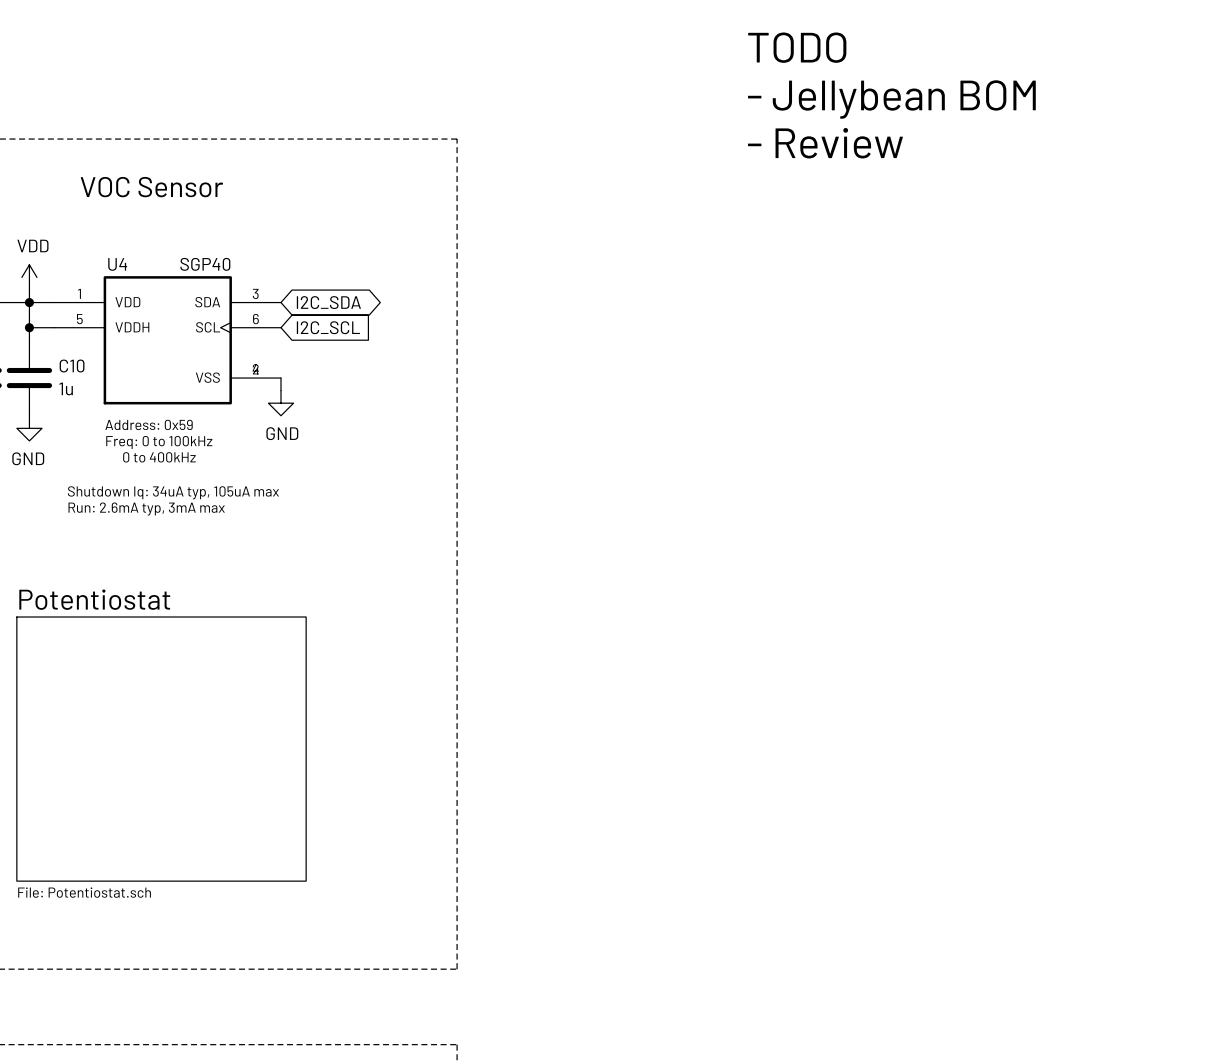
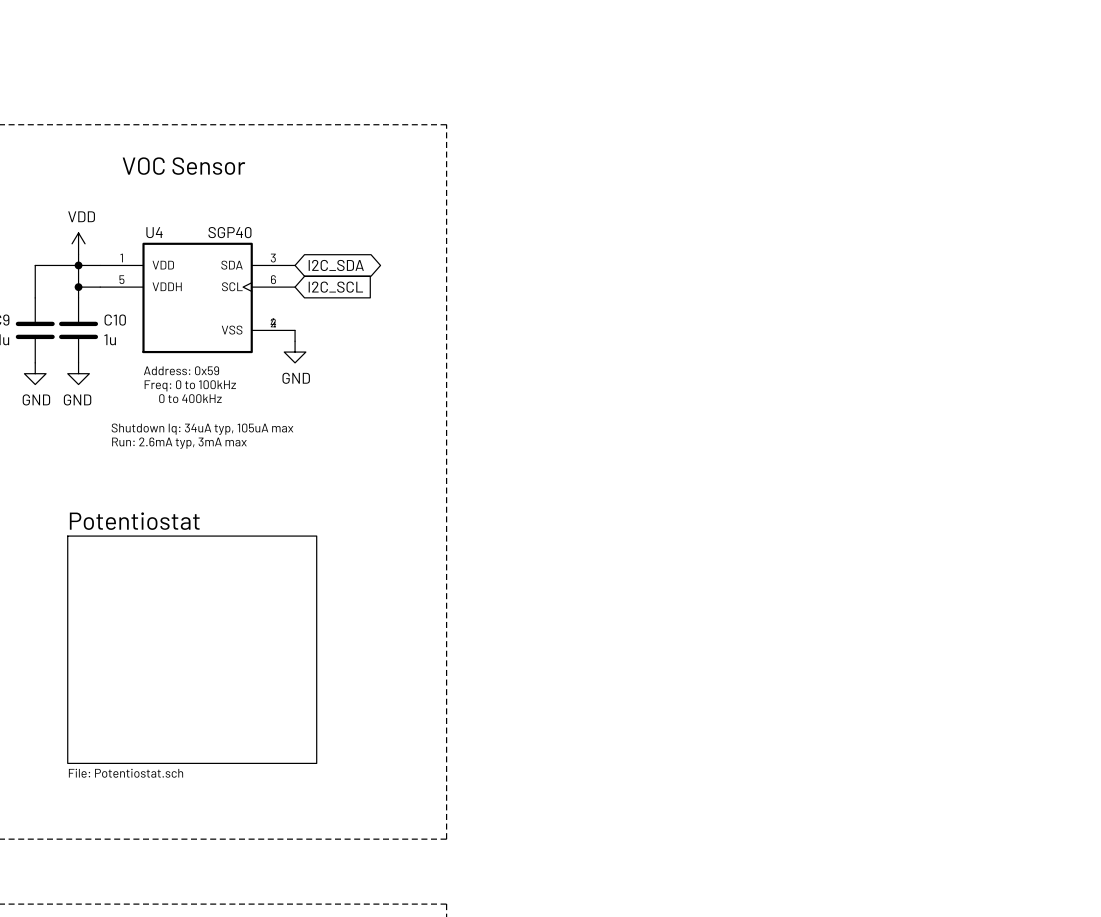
text: TODO (797, 47) -> none
text: - Jellybean BOM (891, 99) -> none
text: - Review (825, 143) -> none

